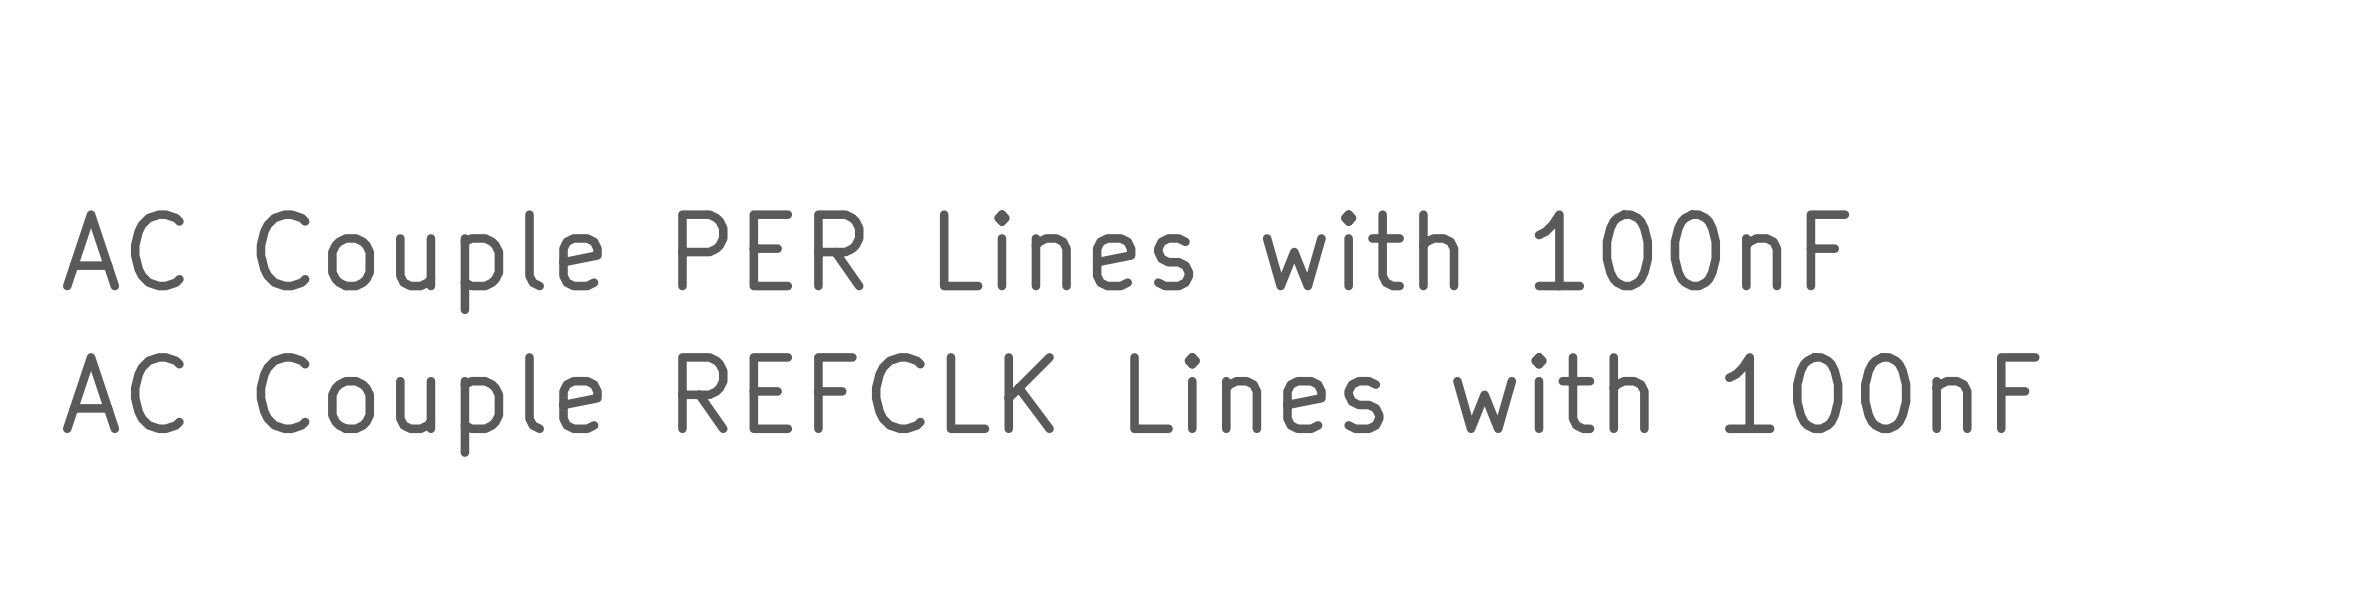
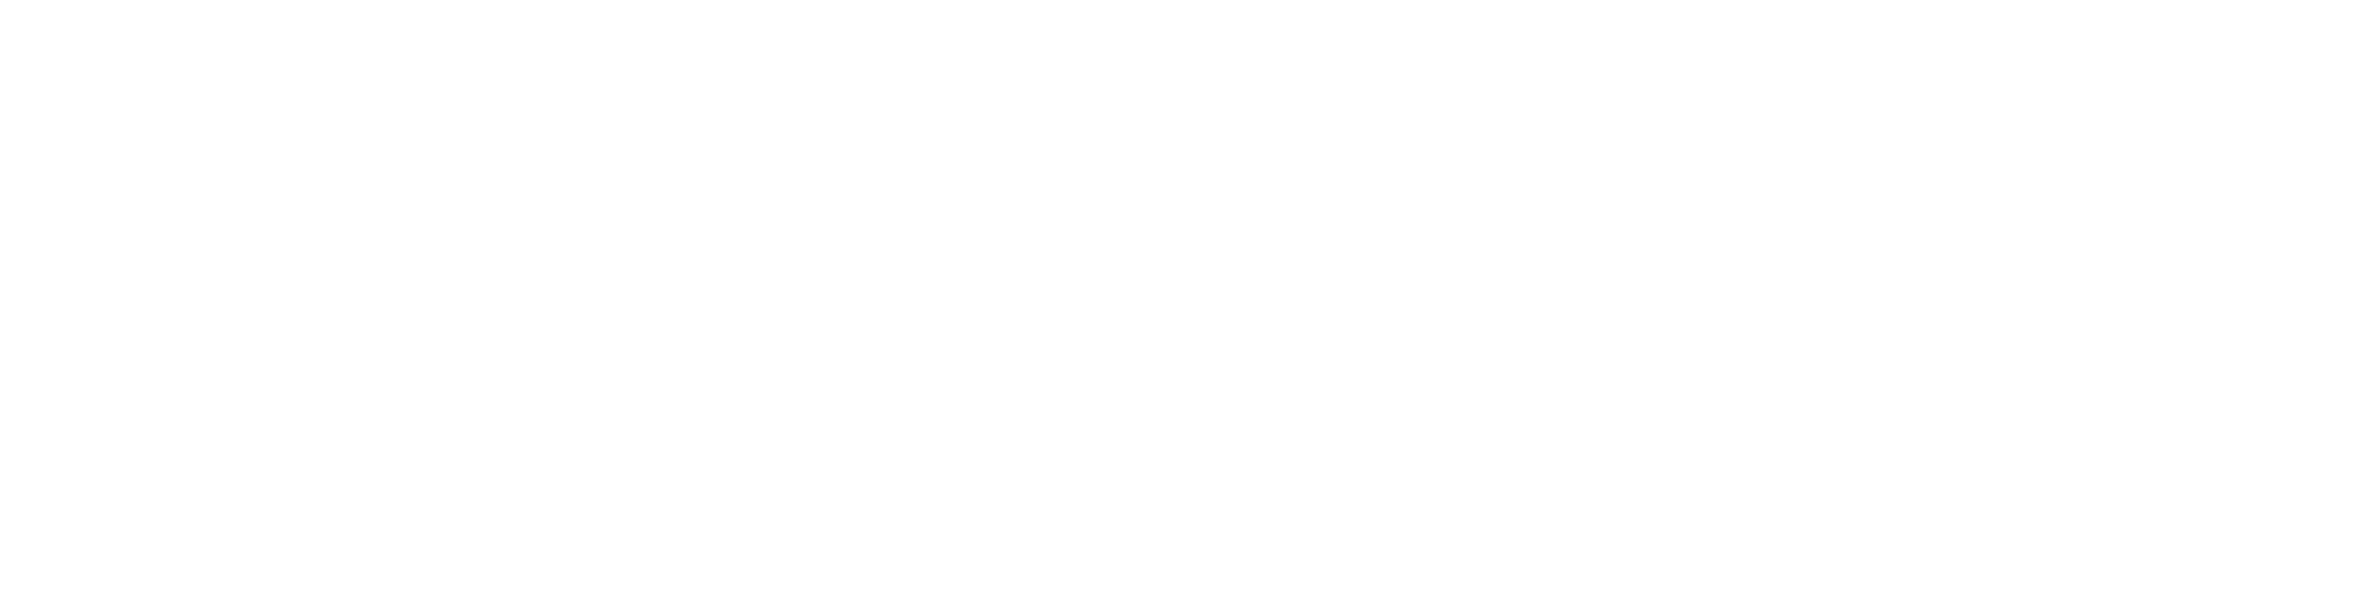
text: AC Couple PER Lines with 100nF (956, 262) -> none
text: AC Couple REFCLK Lines with 100nF (1051, 405) -> none

